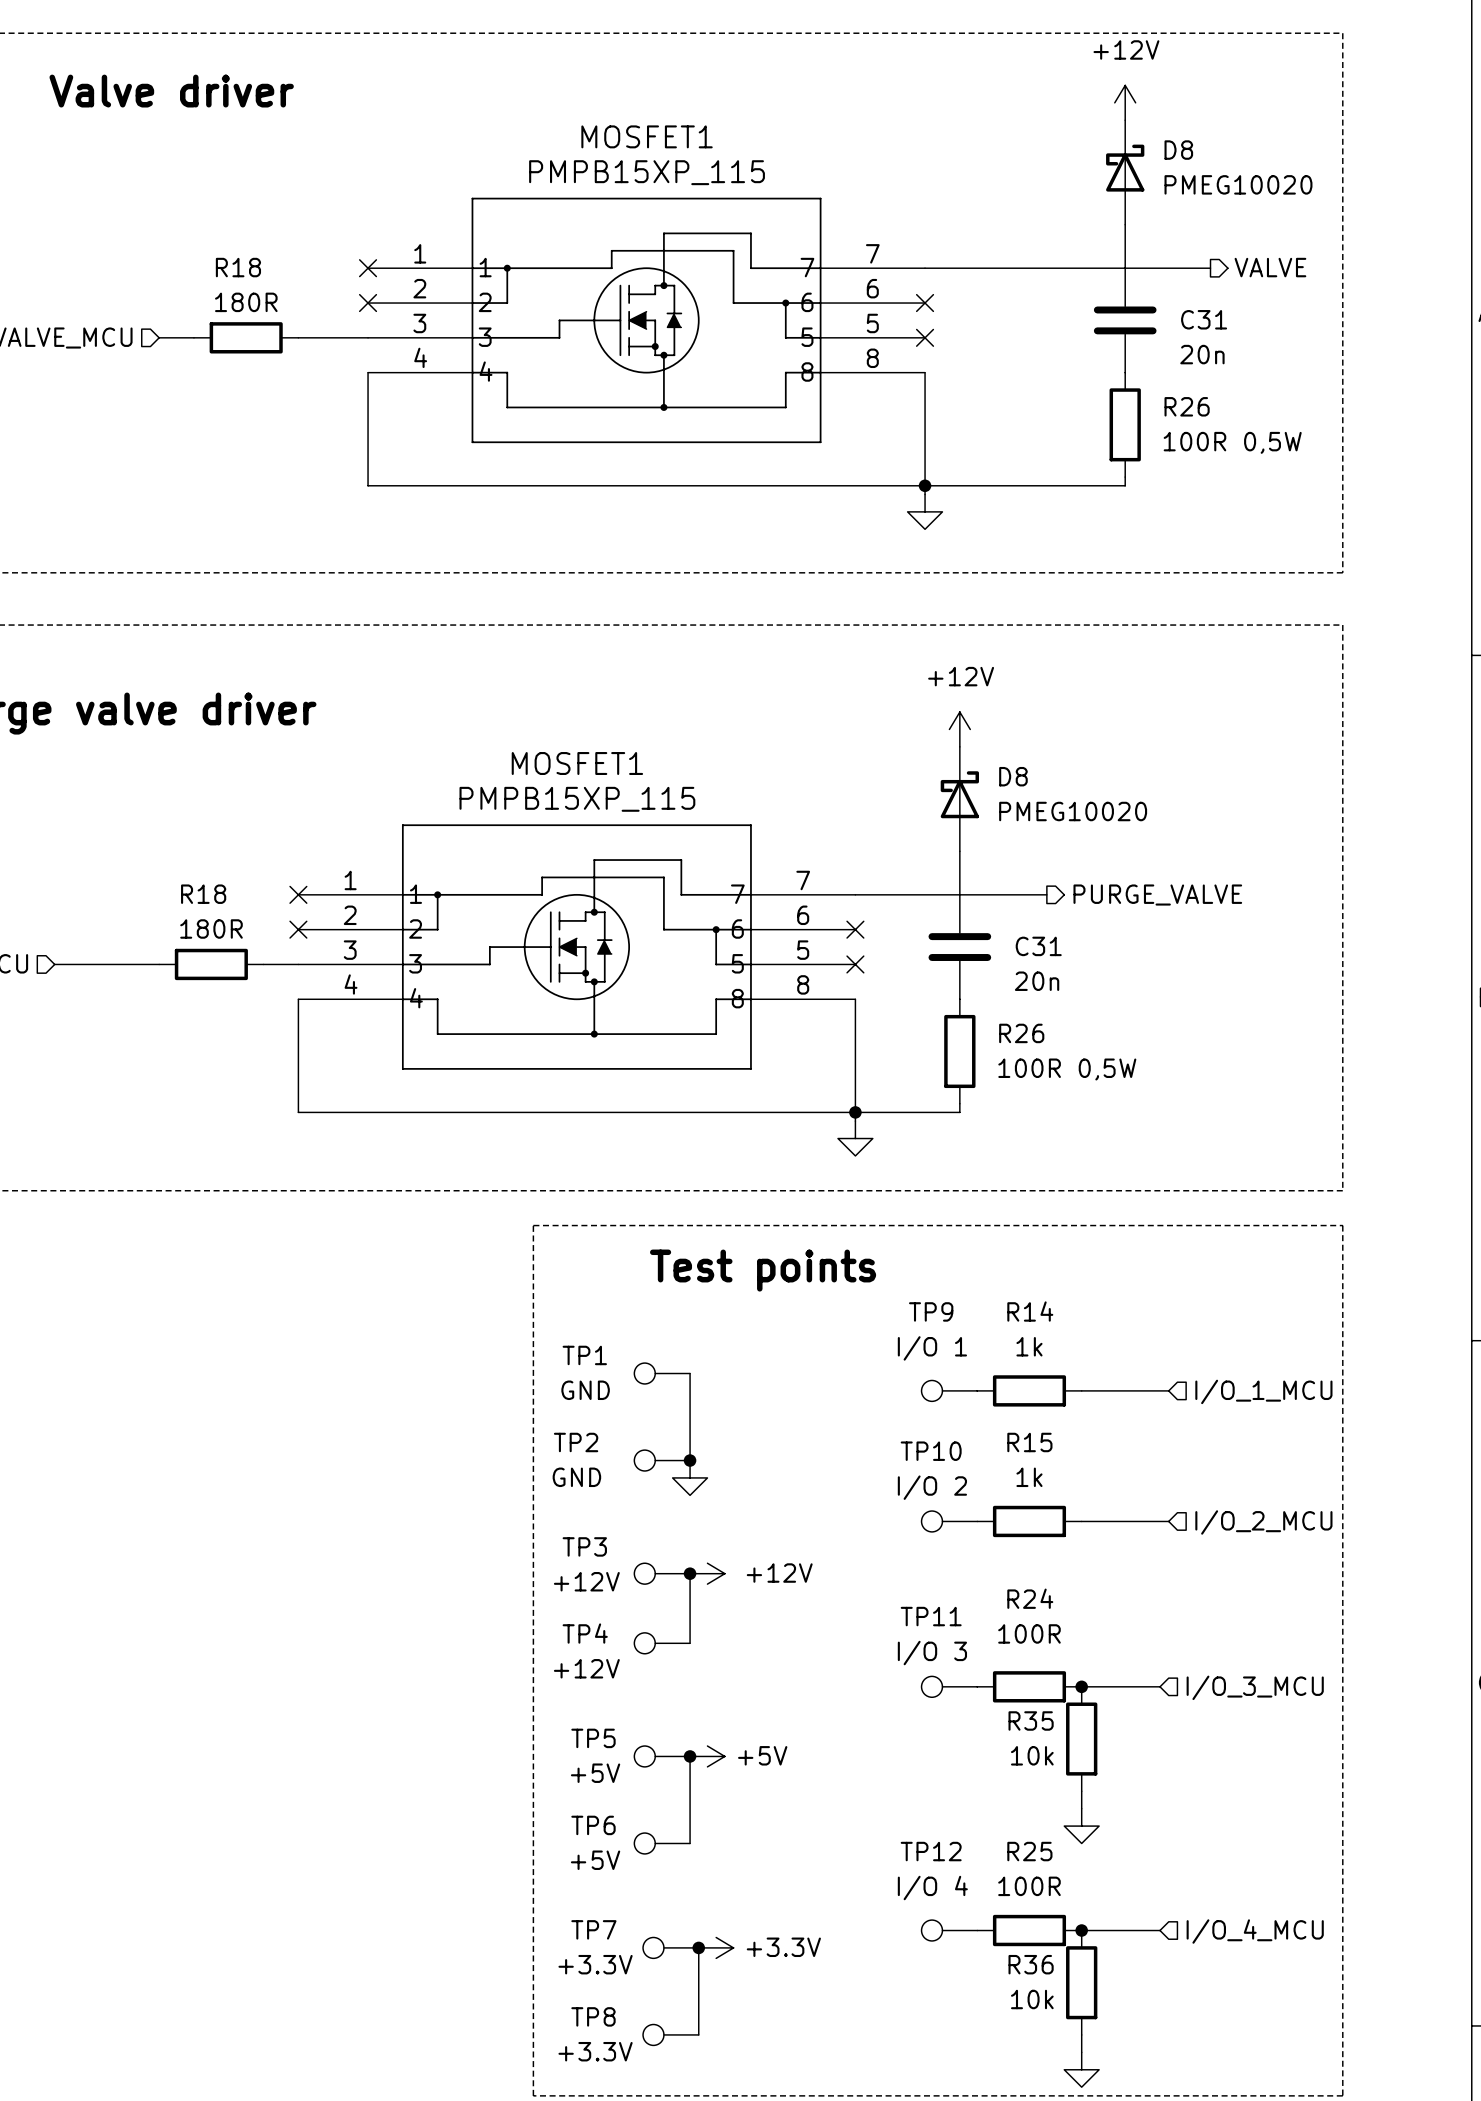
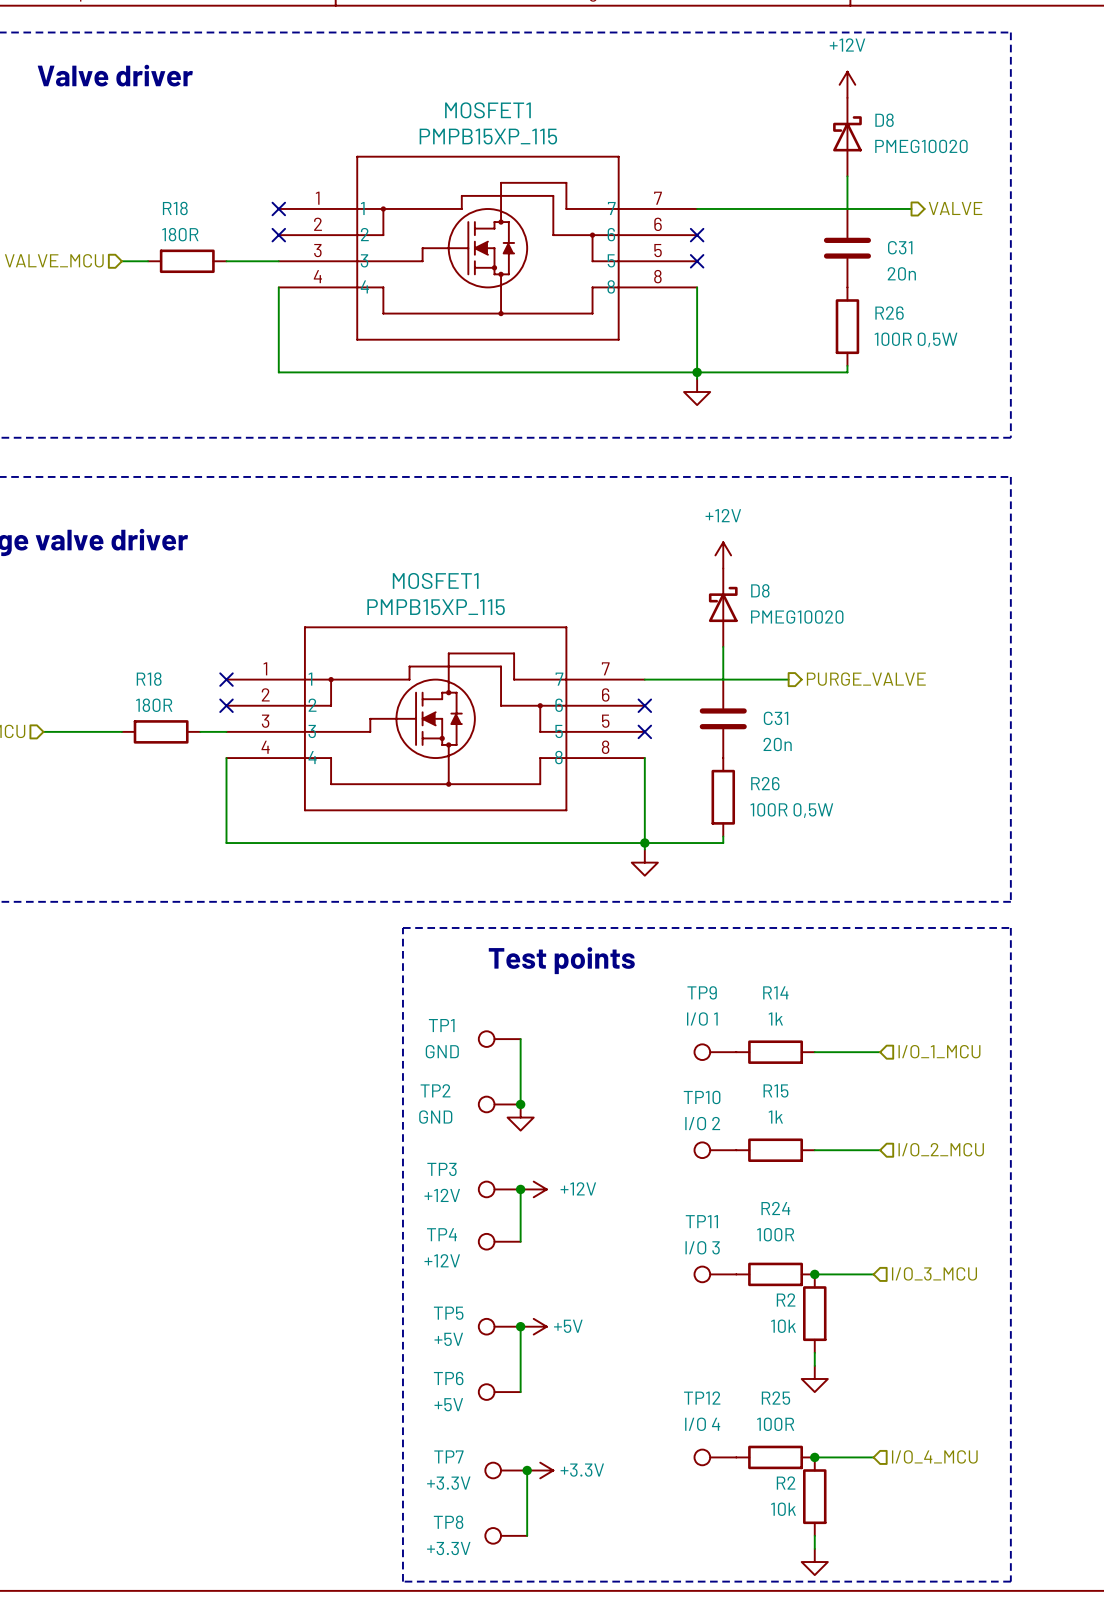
R35 name: R35 (1031, 1720) -> R2 (786, 1299)
R36 name: R36 (1031, 1964) -> R2 (786, 1483)

